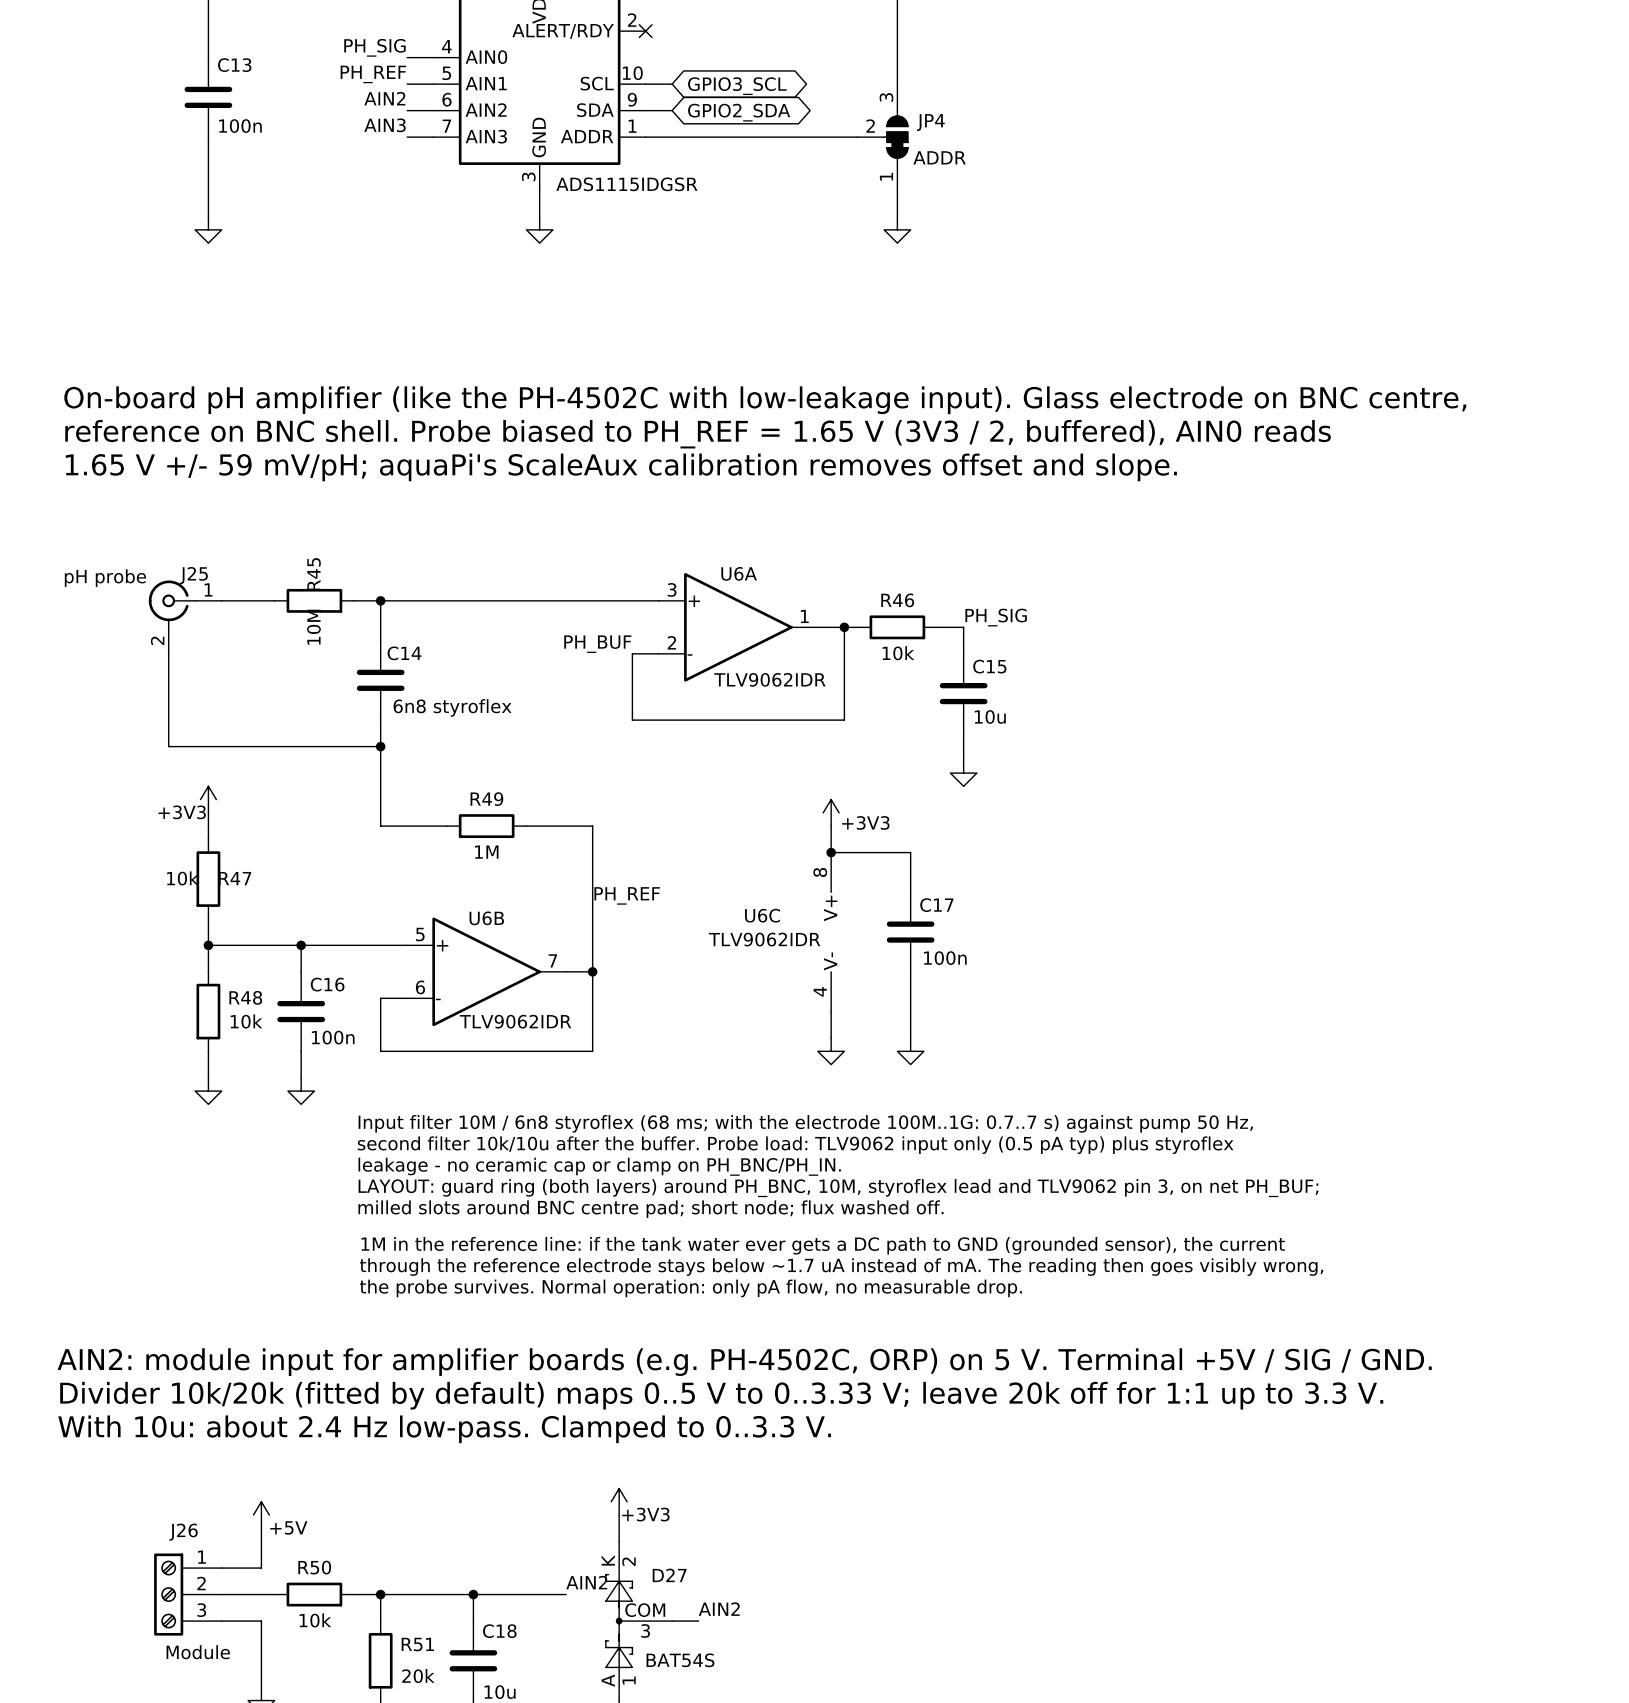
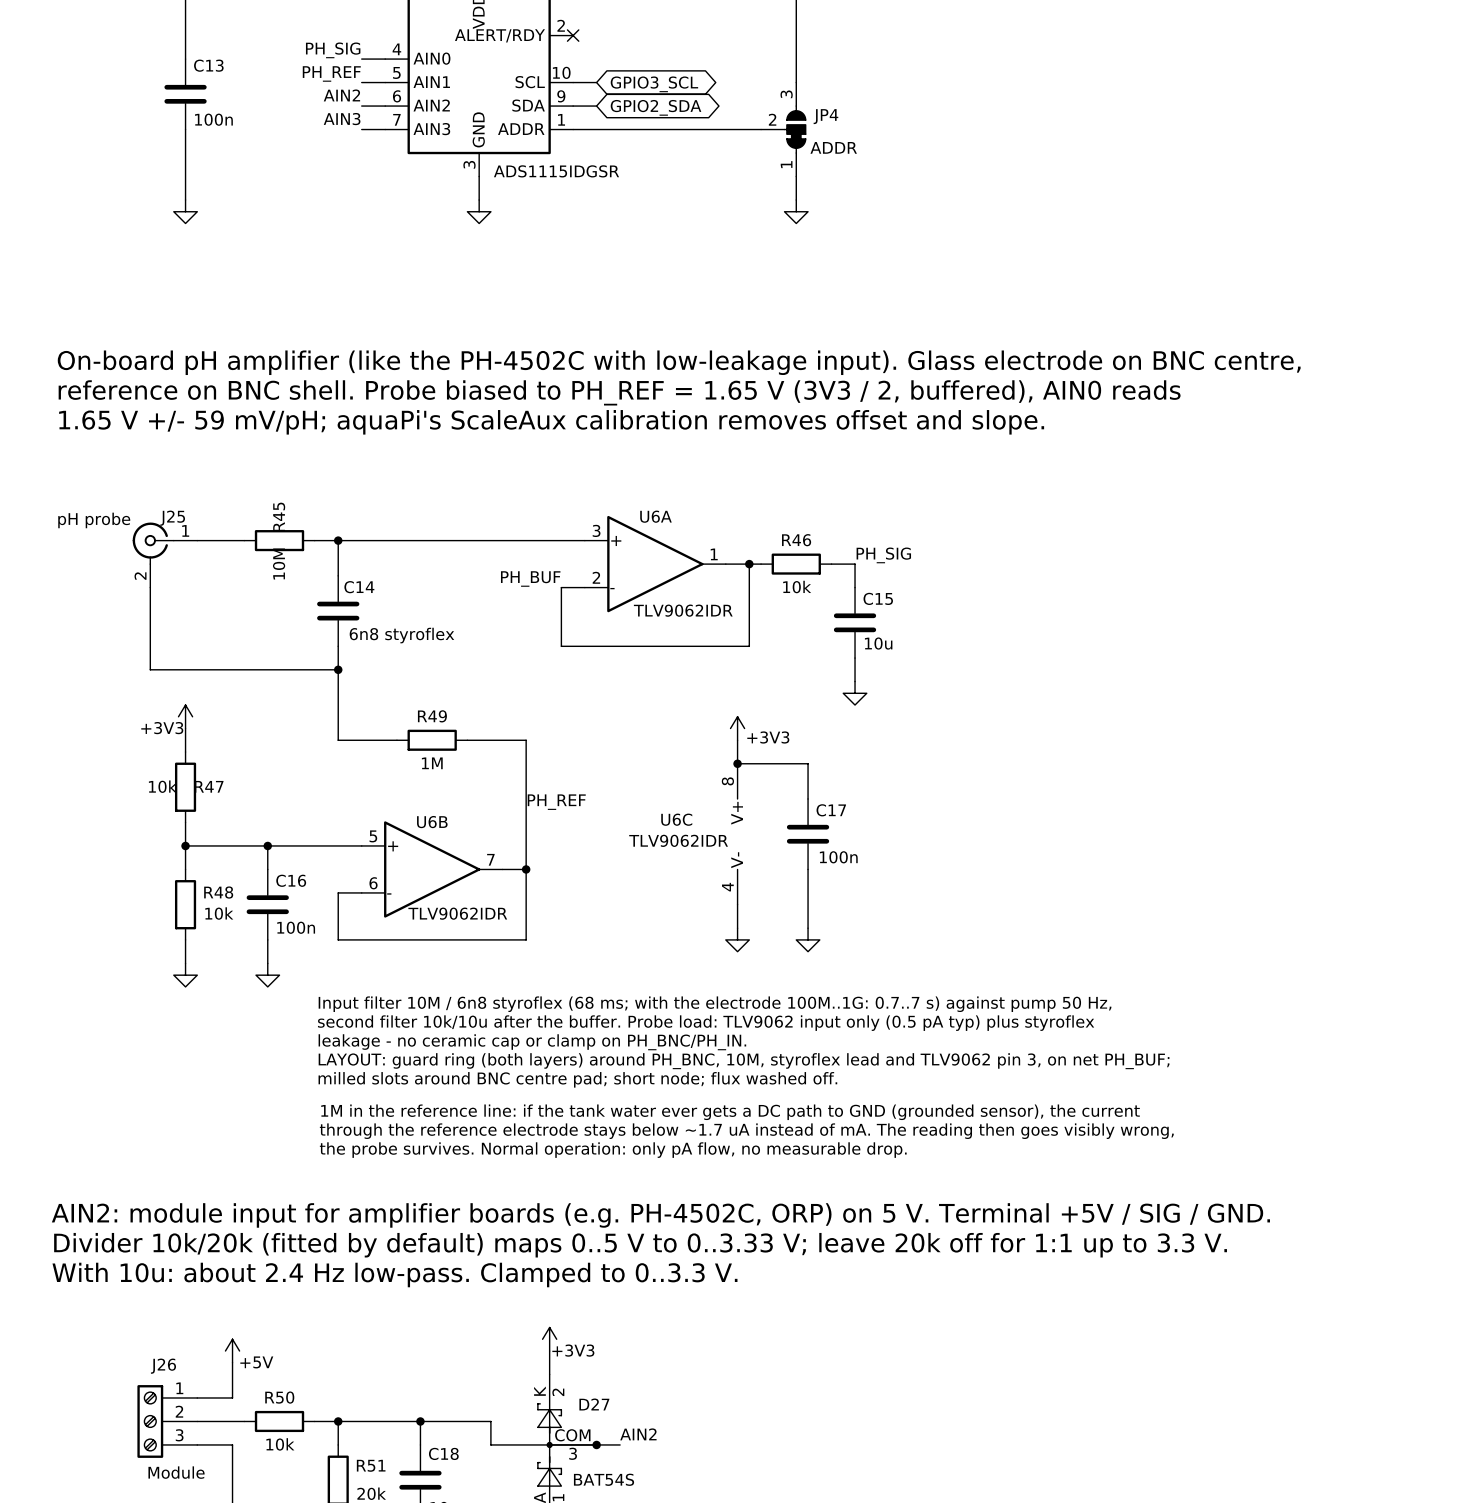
label: AIN2 (586, 1582) -> none
wire: (552, 1594) (566, 1594) -> (490, 1421) (490, 1444) (596, 1444)
junction: none -> (596, 1444)

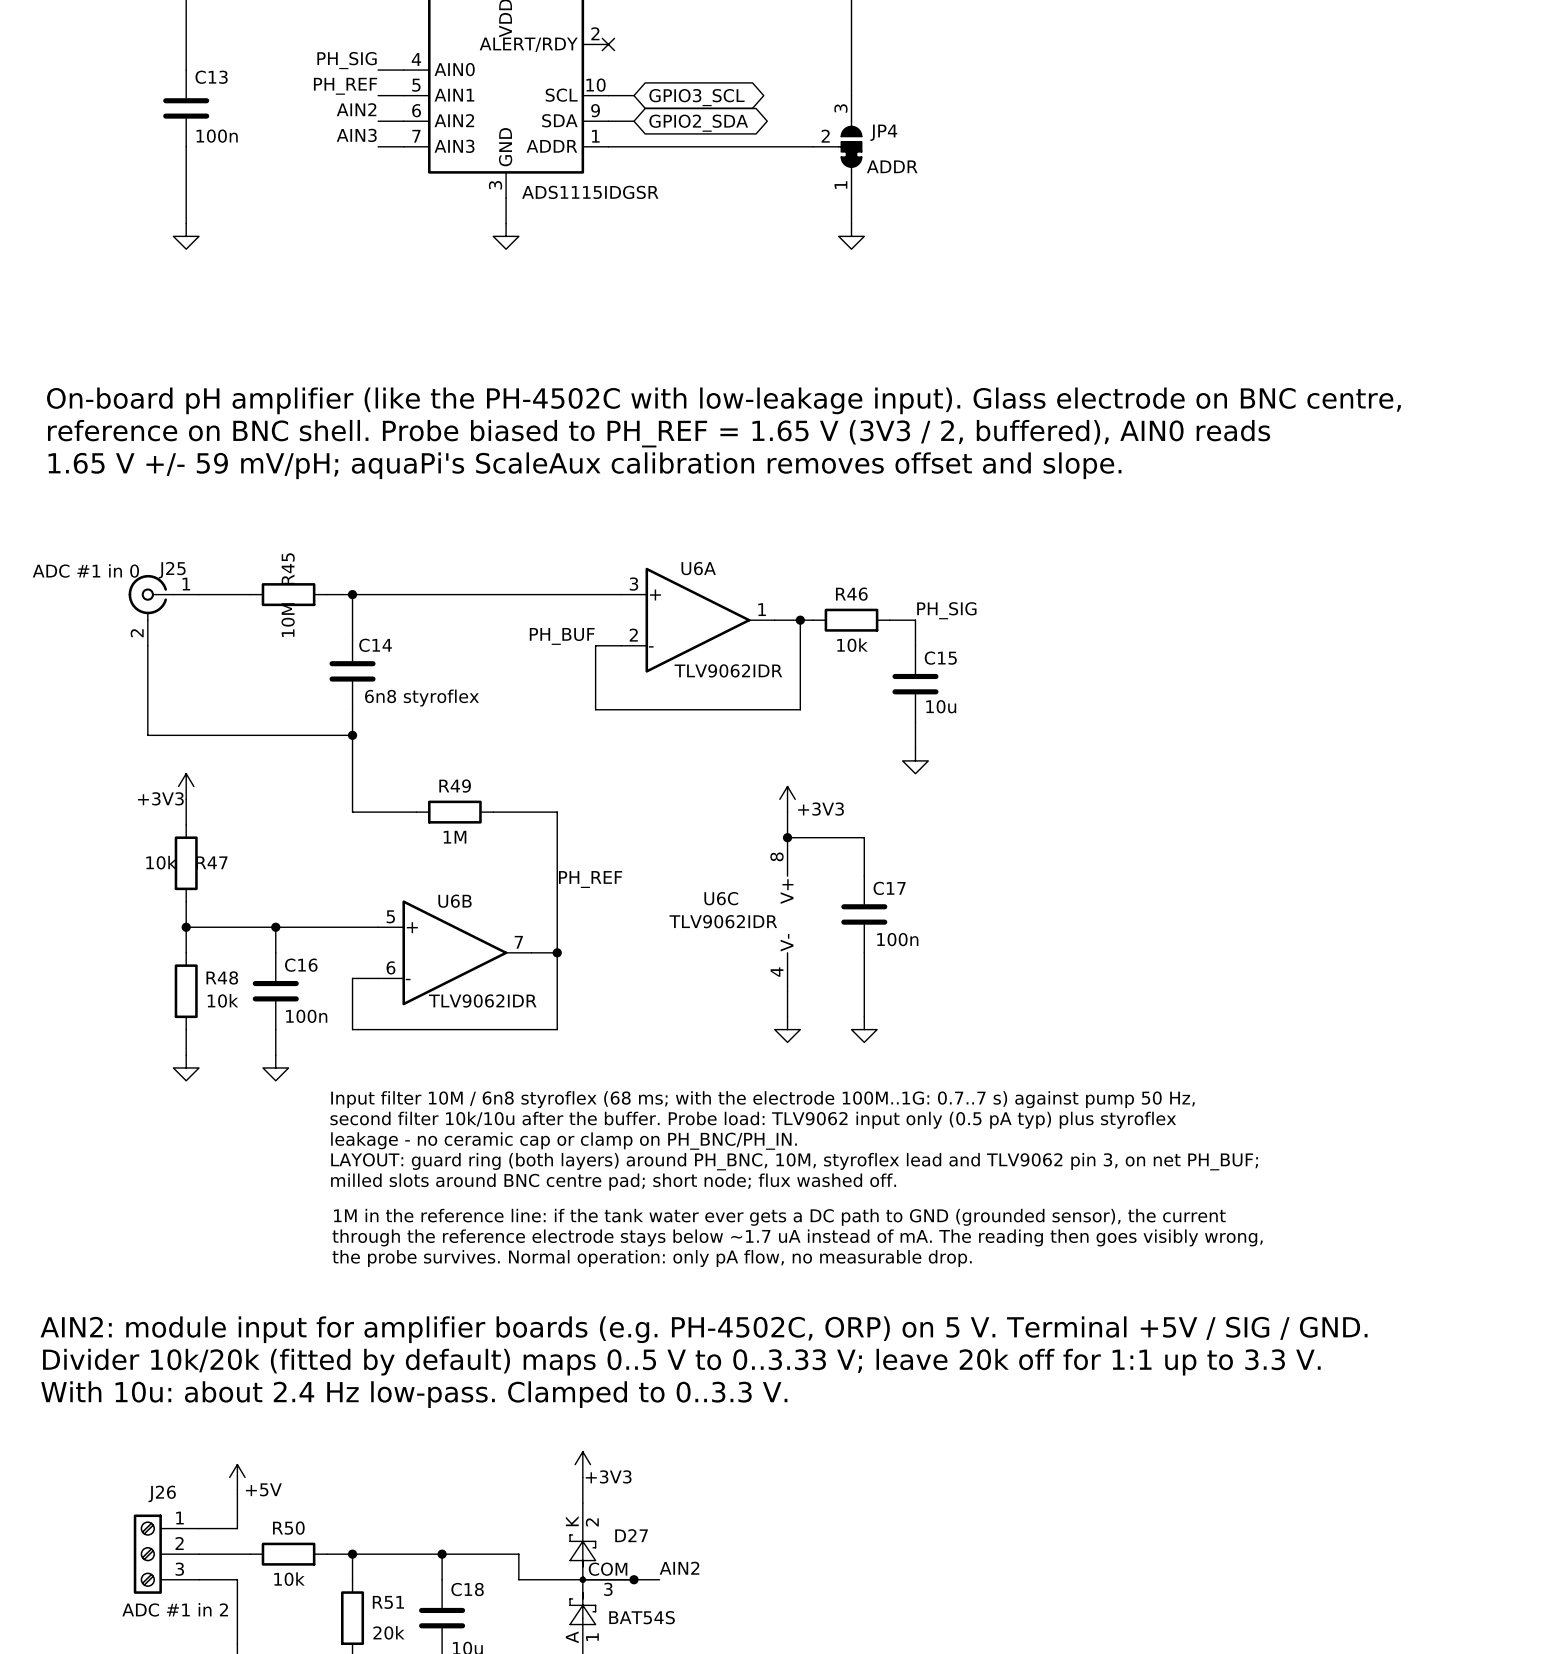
J25 value: pH probe (94, 520) -> ADC #1 in 0 (85, 570)
J26 value: Module (176, 1472) -> ADC #1 in 2 (175, 1609)

